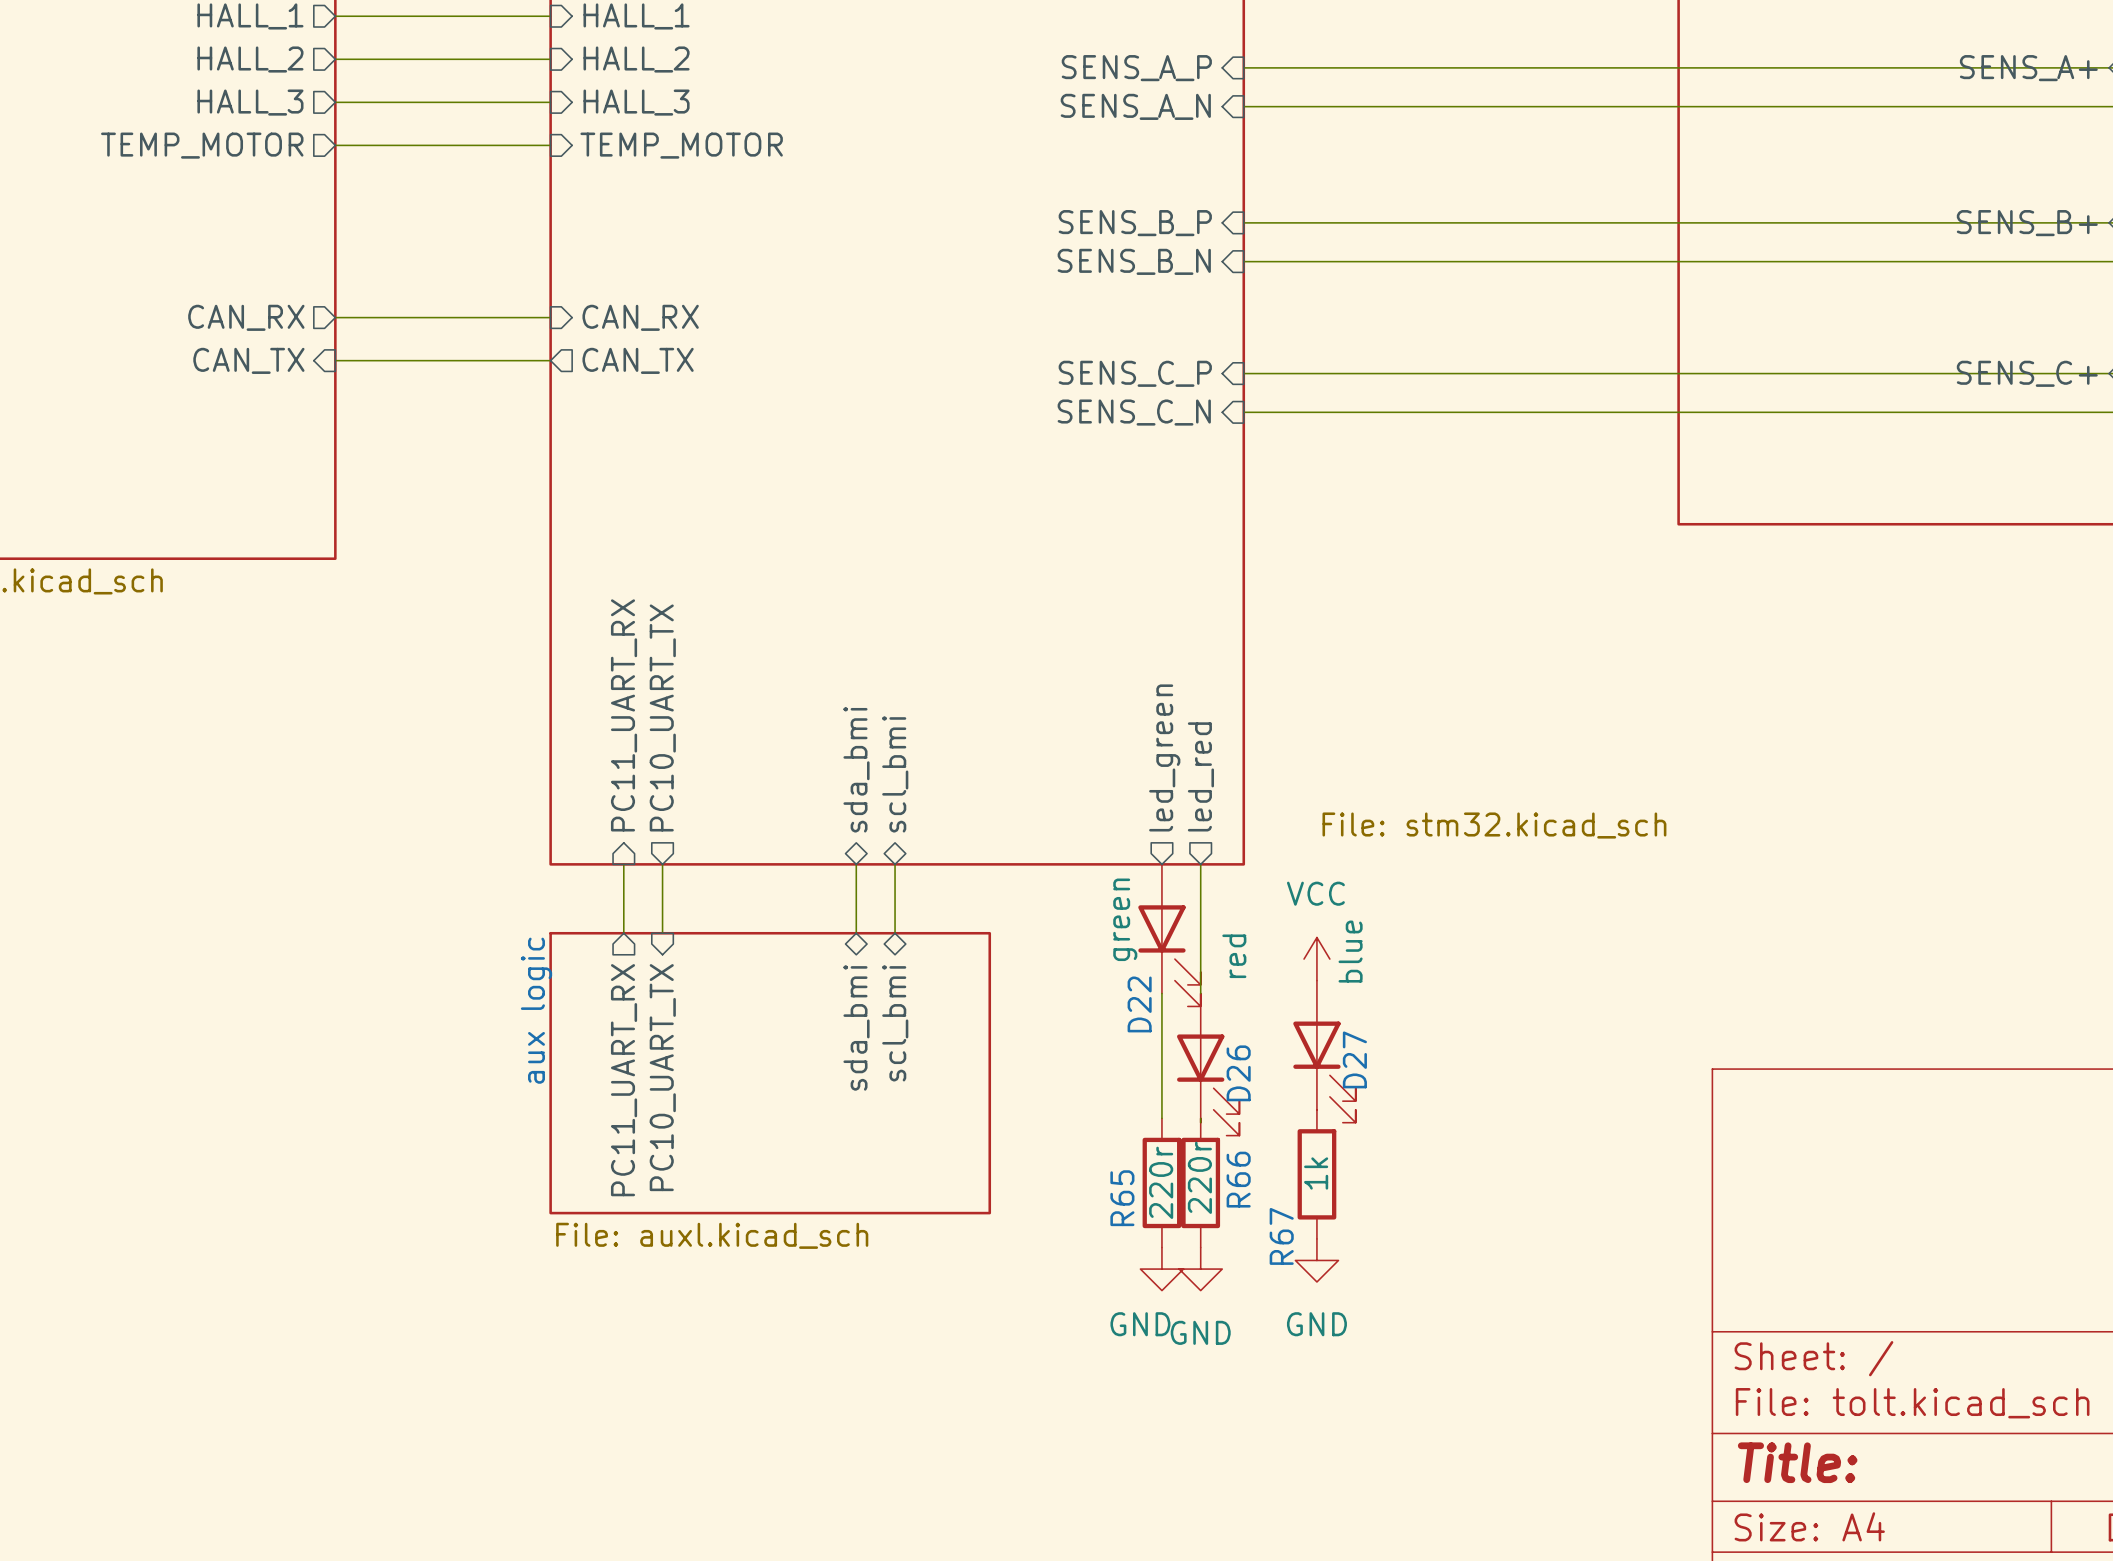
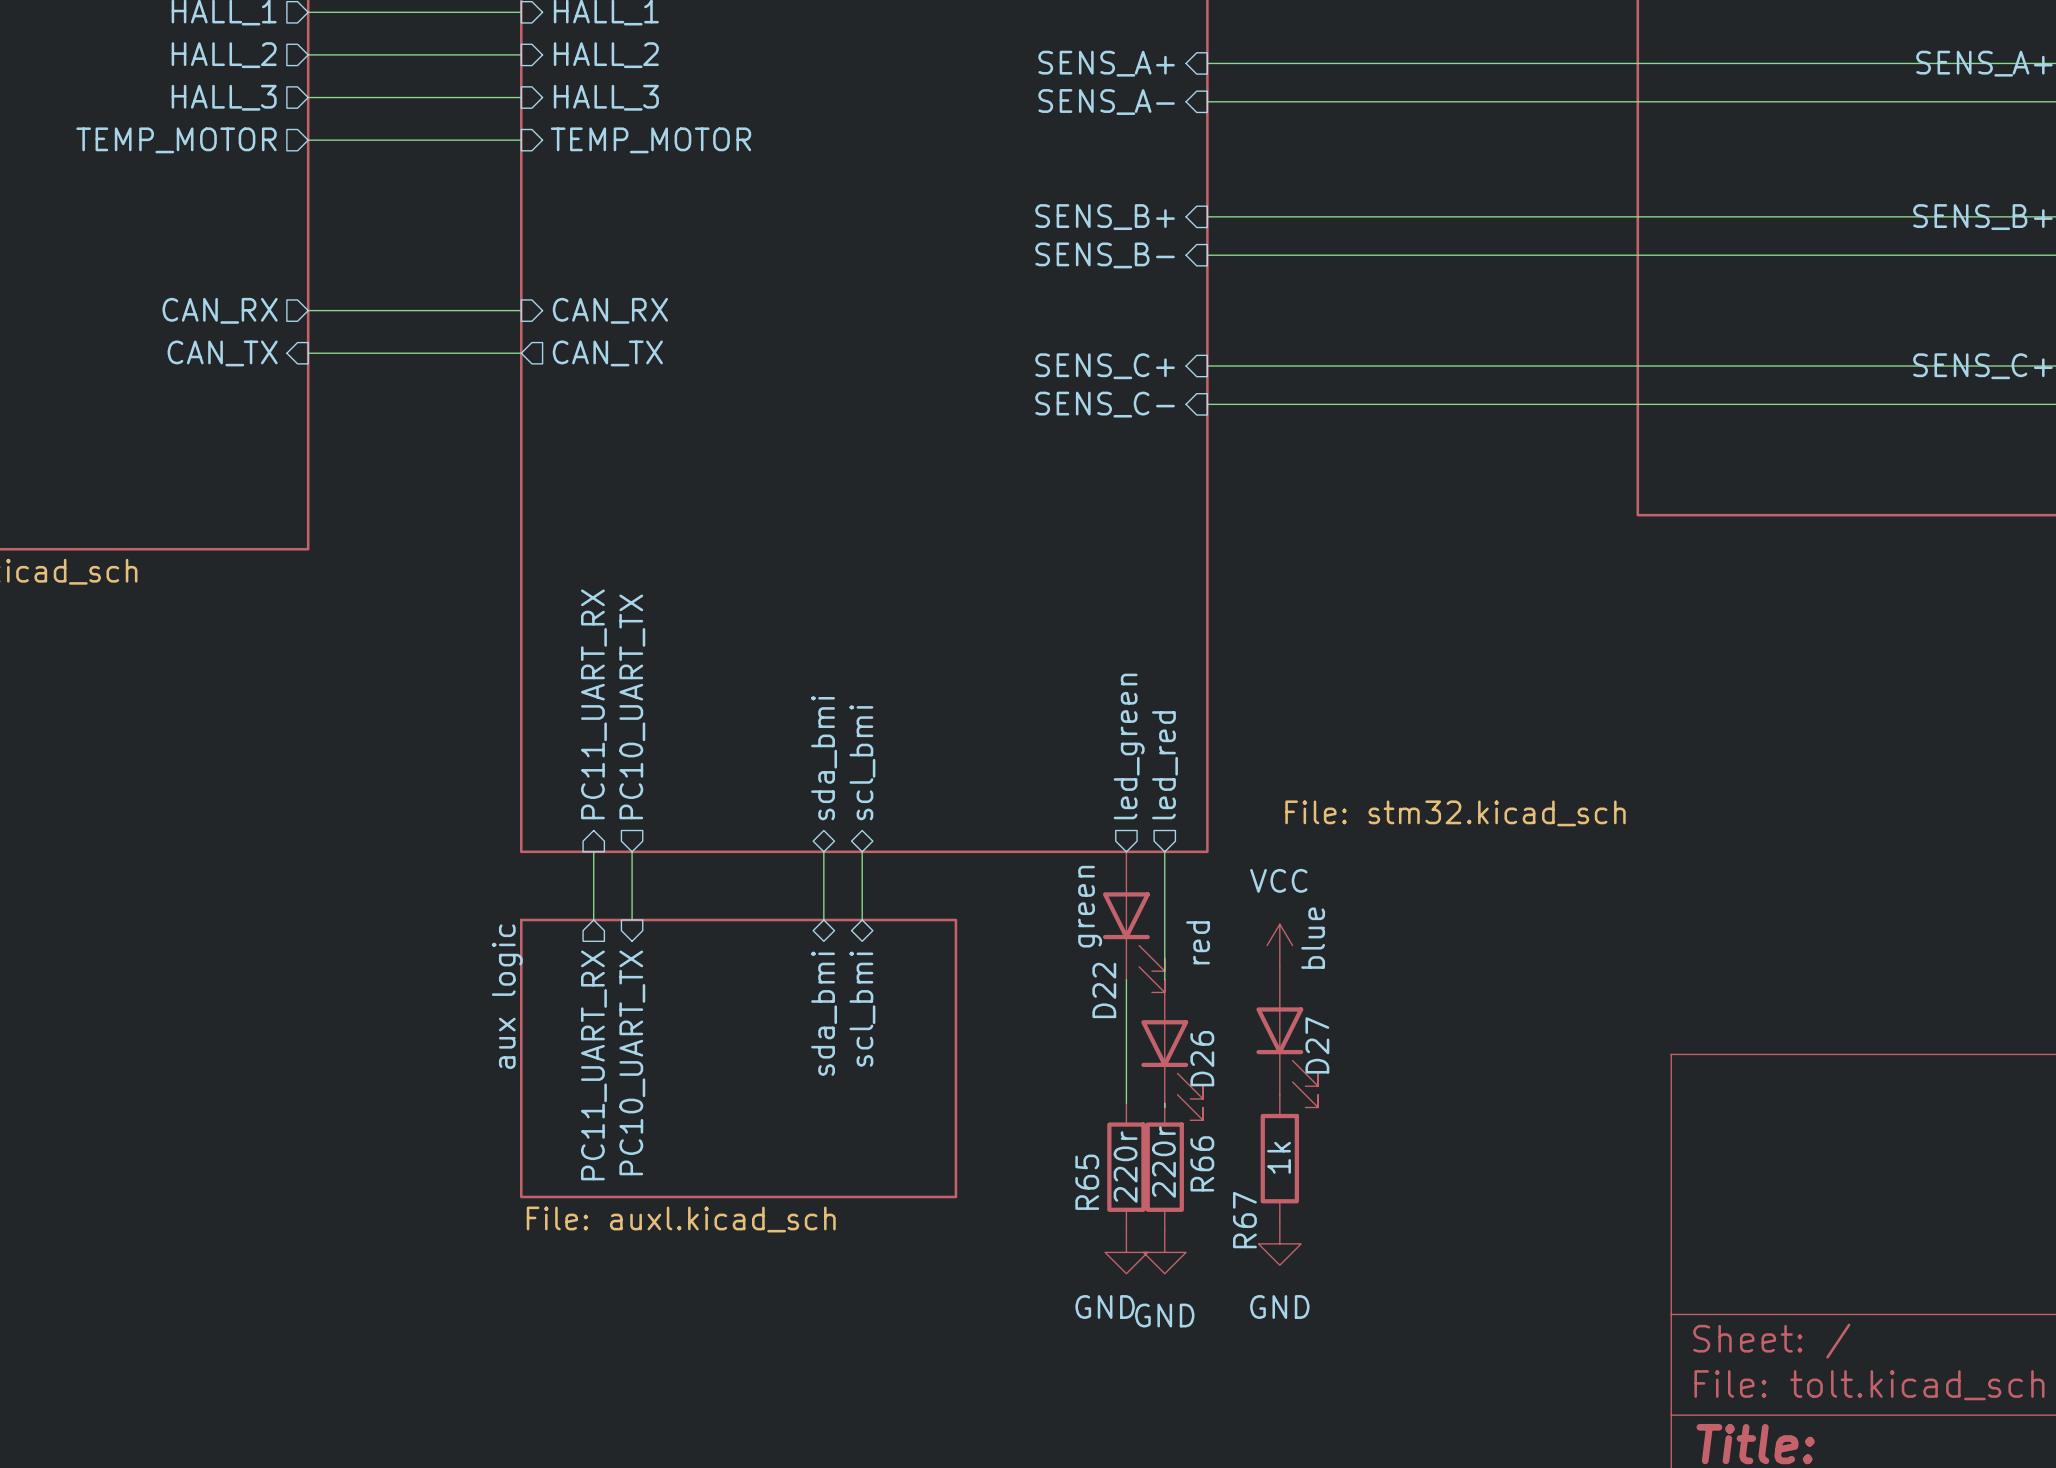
sheet pin: SENS_A_P (1136, 68) -> SENS_A+ (1106, 63)
sheet pin: SENS_A_N (1135, 106) -> SENS_A- (1106, 102)
sheet pin: SENS_B_P (1135, 223) -> SENS_B+ (1105, 217)
sheet pin: SENS_B_N (1134, 261) -> SENS_B- (1105, 255)
sheet pin: SENS_C_P (1135, 373) -> SENS_C+ (1105, 366)
sheet pin: SENS_C_N (1134, 412) -> SENS_C- (1105, 404)

